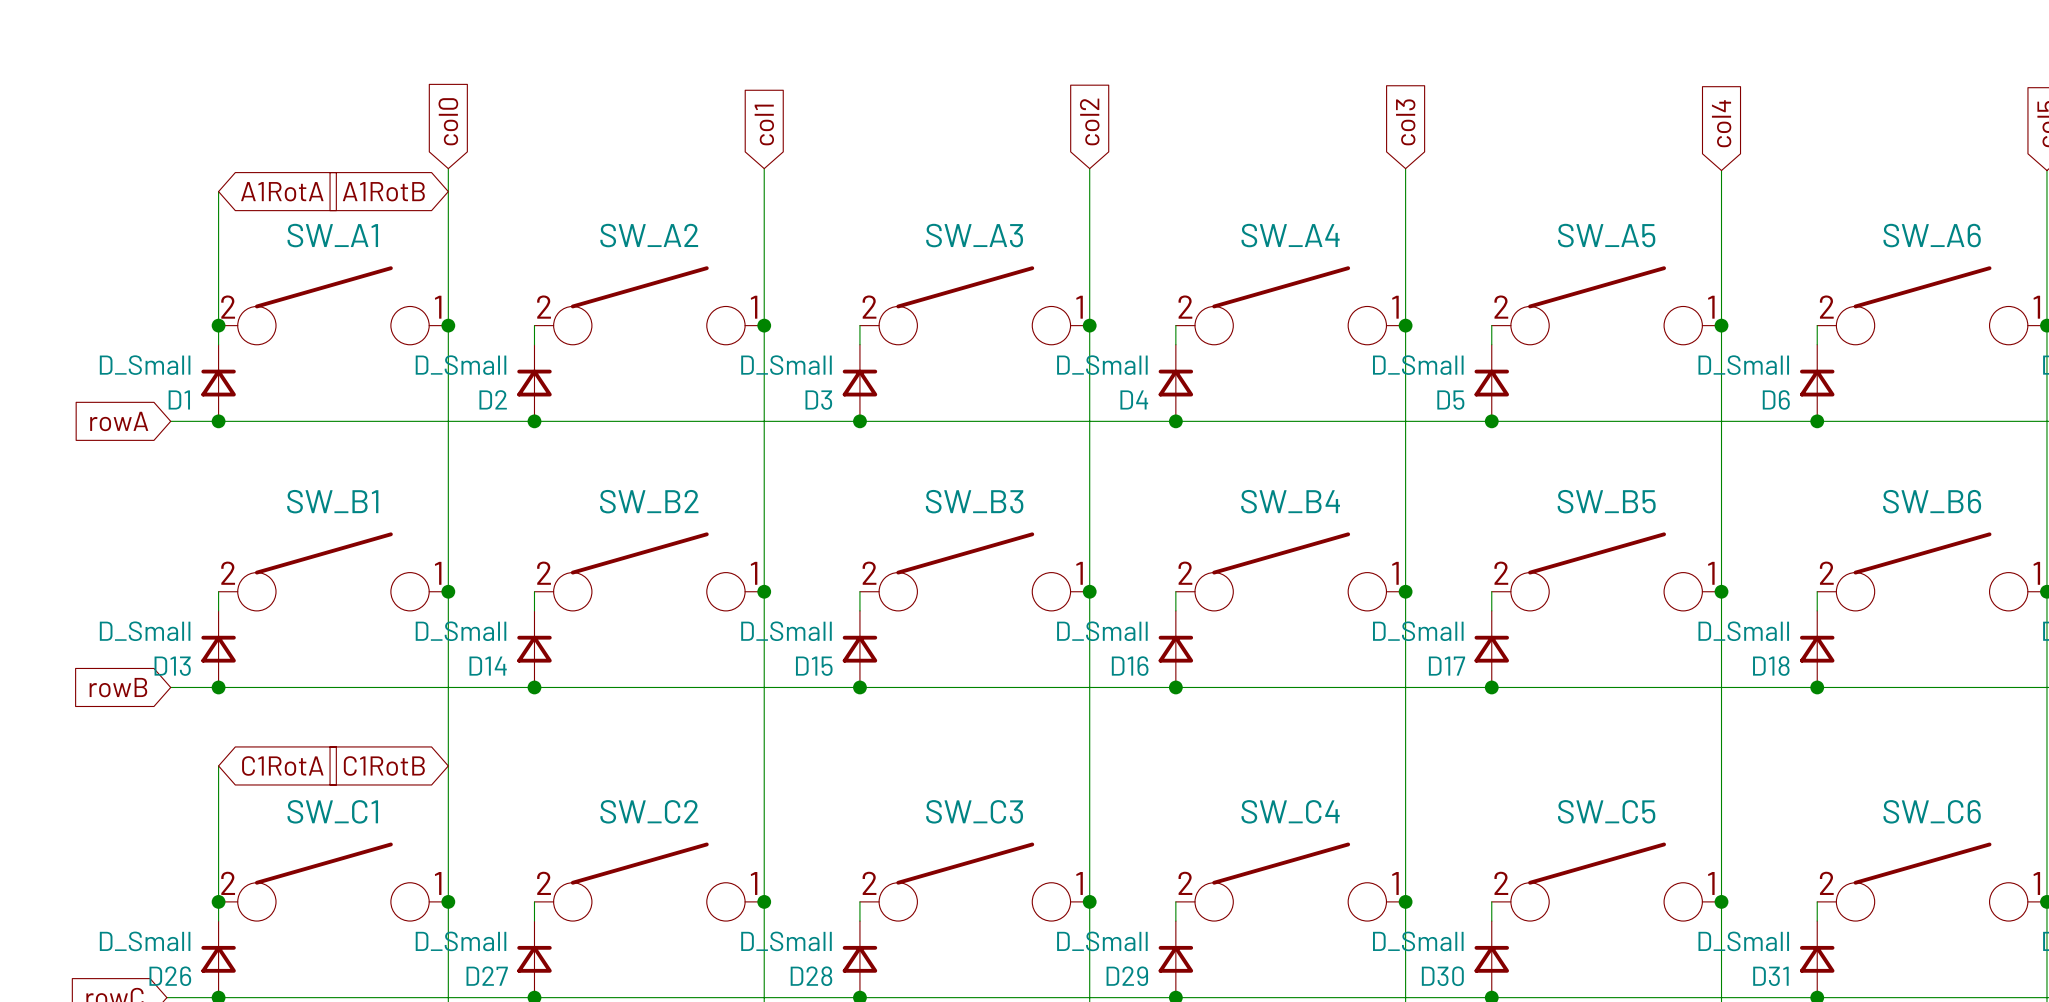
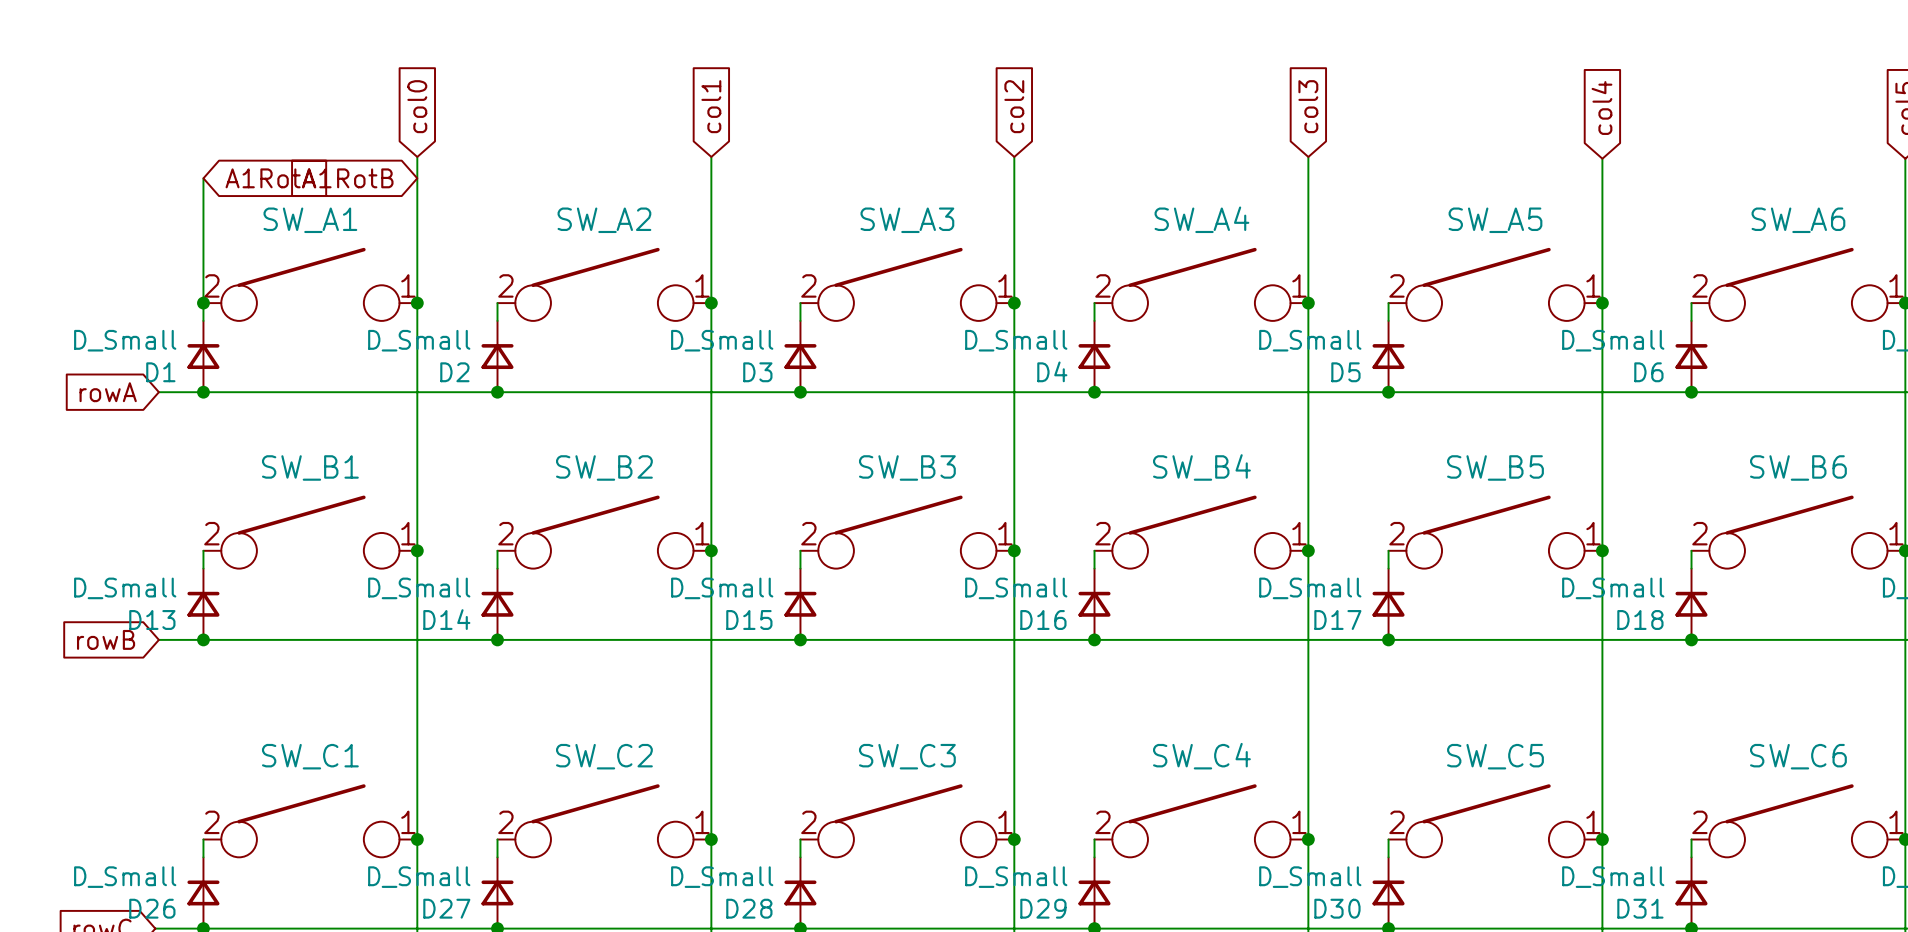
wire: (218, 765) (218, 901) -> none
global label: C1RotA (282, 765) -> none
global label: C1RotB (384, 765) -> none
junction: (218, 901) -> none

